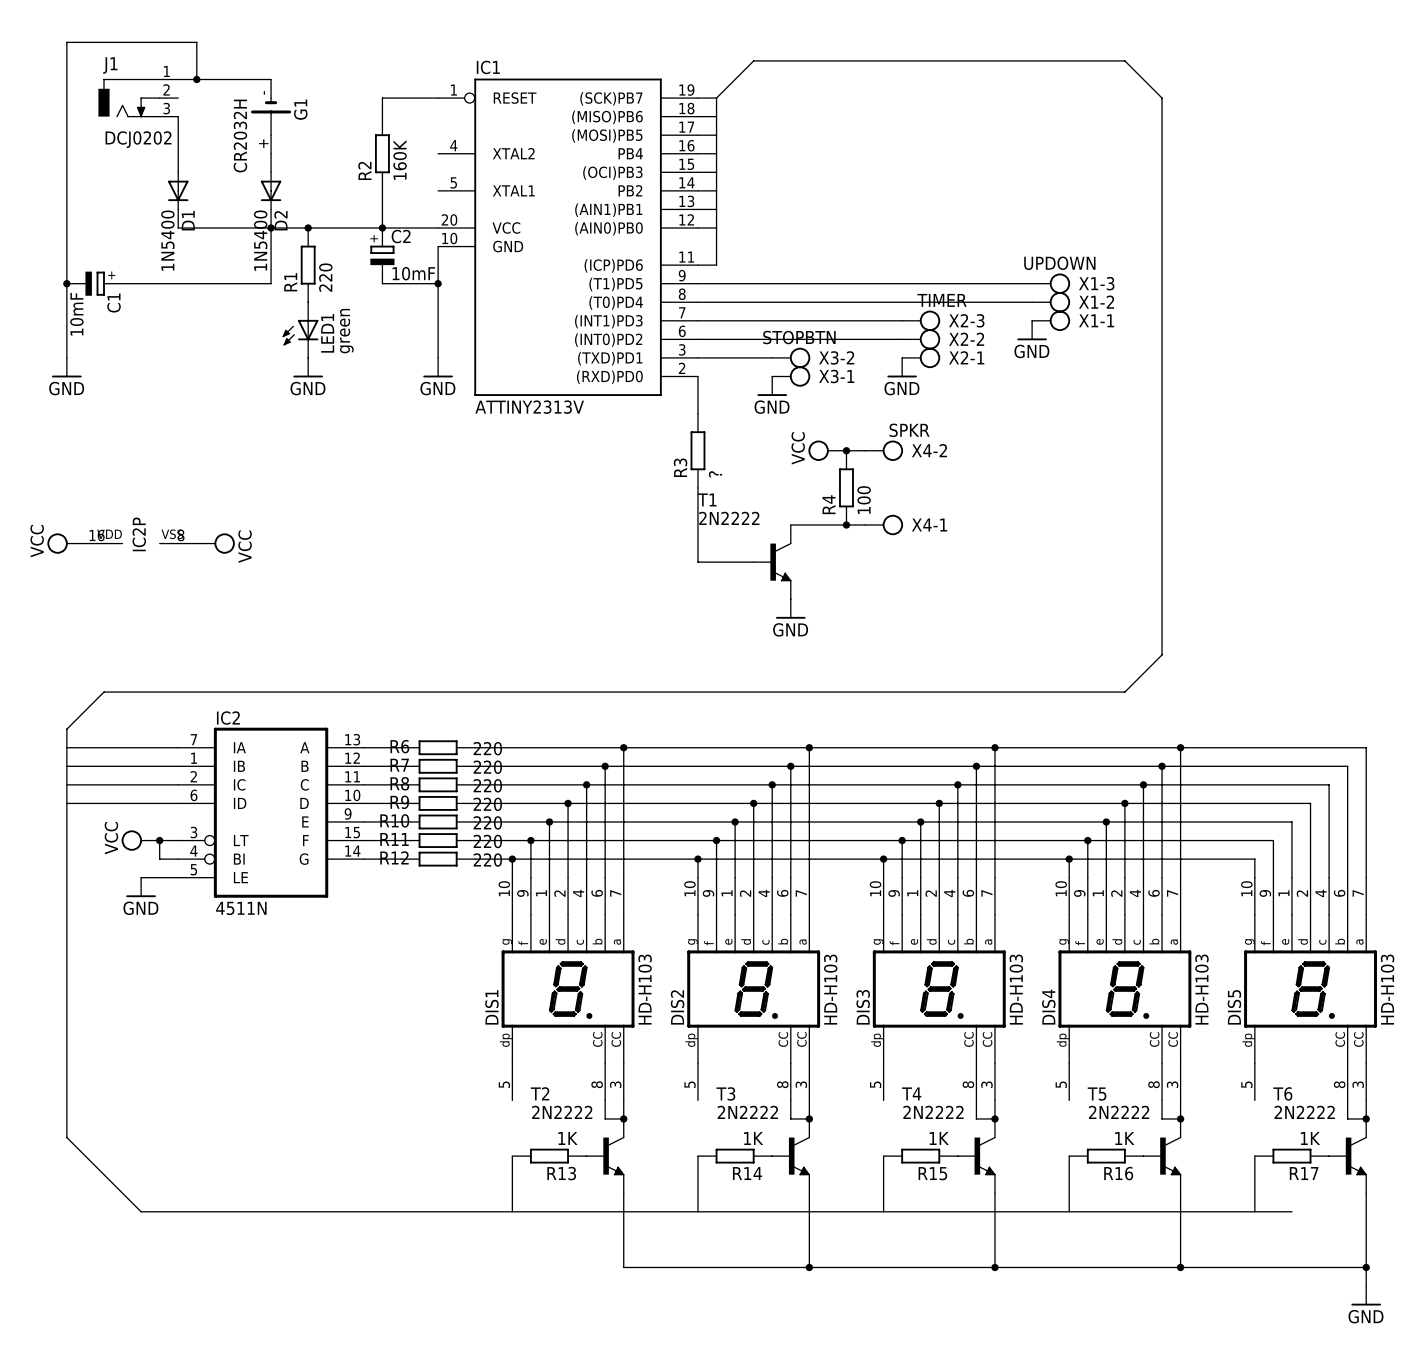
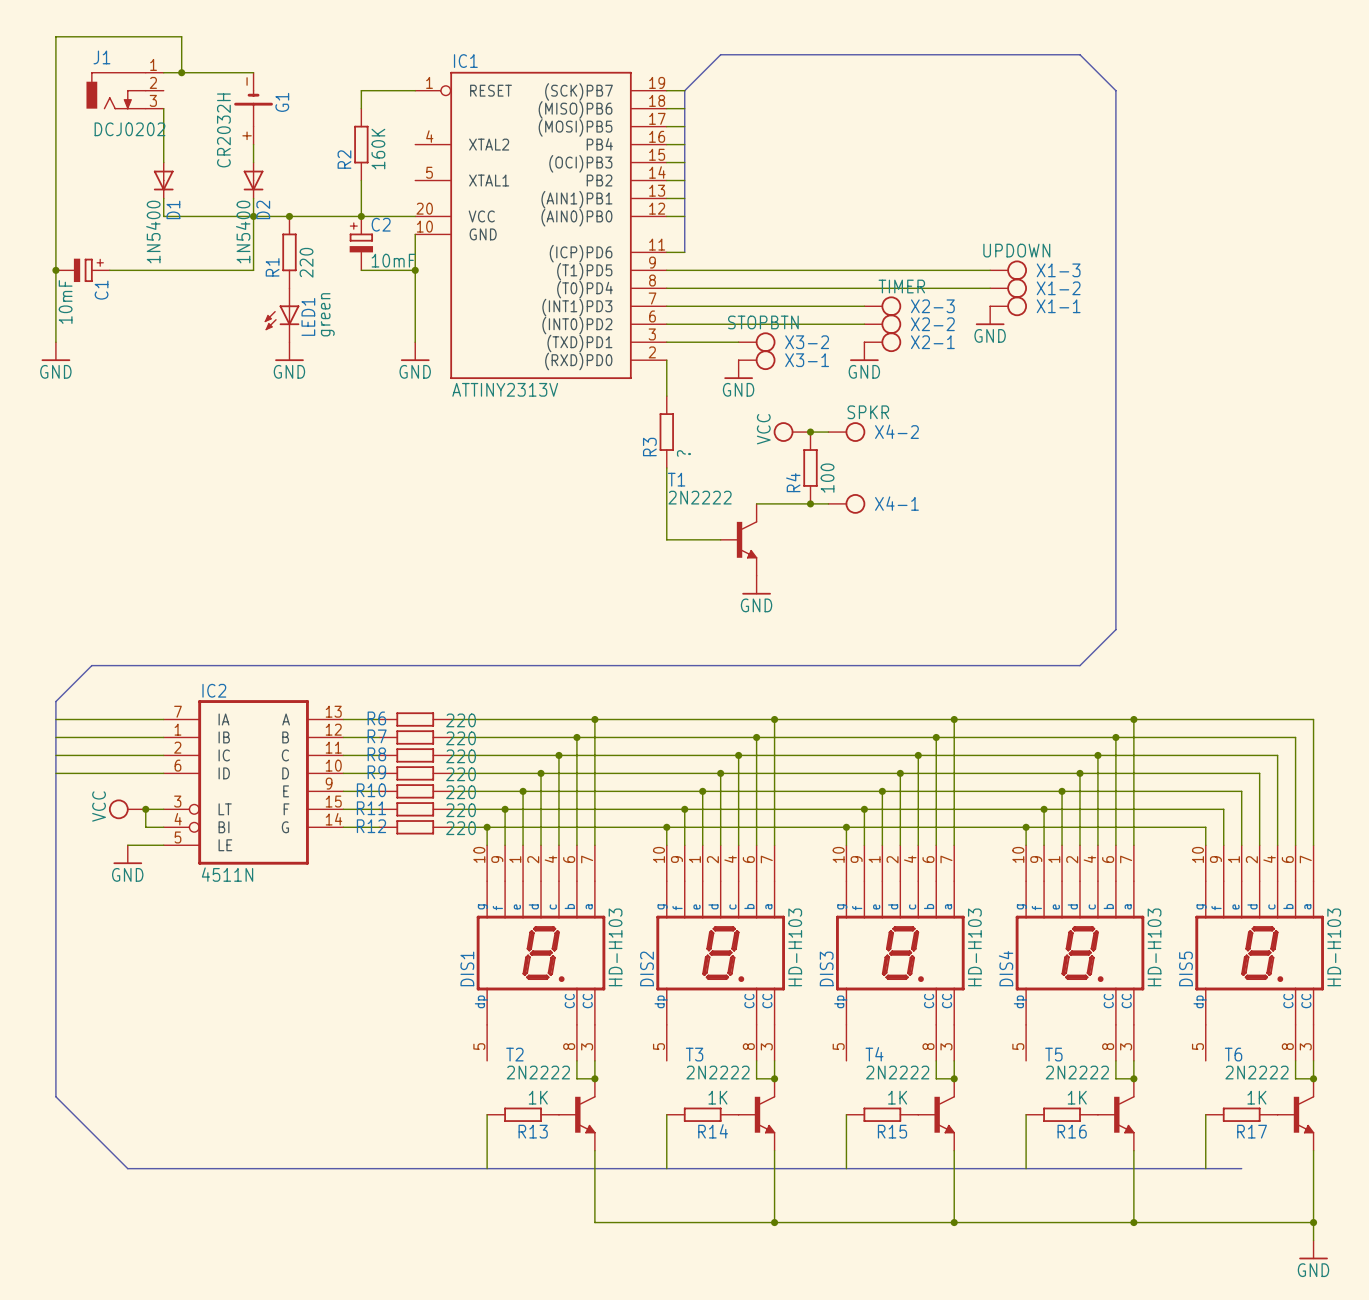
power symbol: VCC (66, 543) -> none
IC2P: (141, 543) -> none
power symbol: VCC (215, 543) -> none

